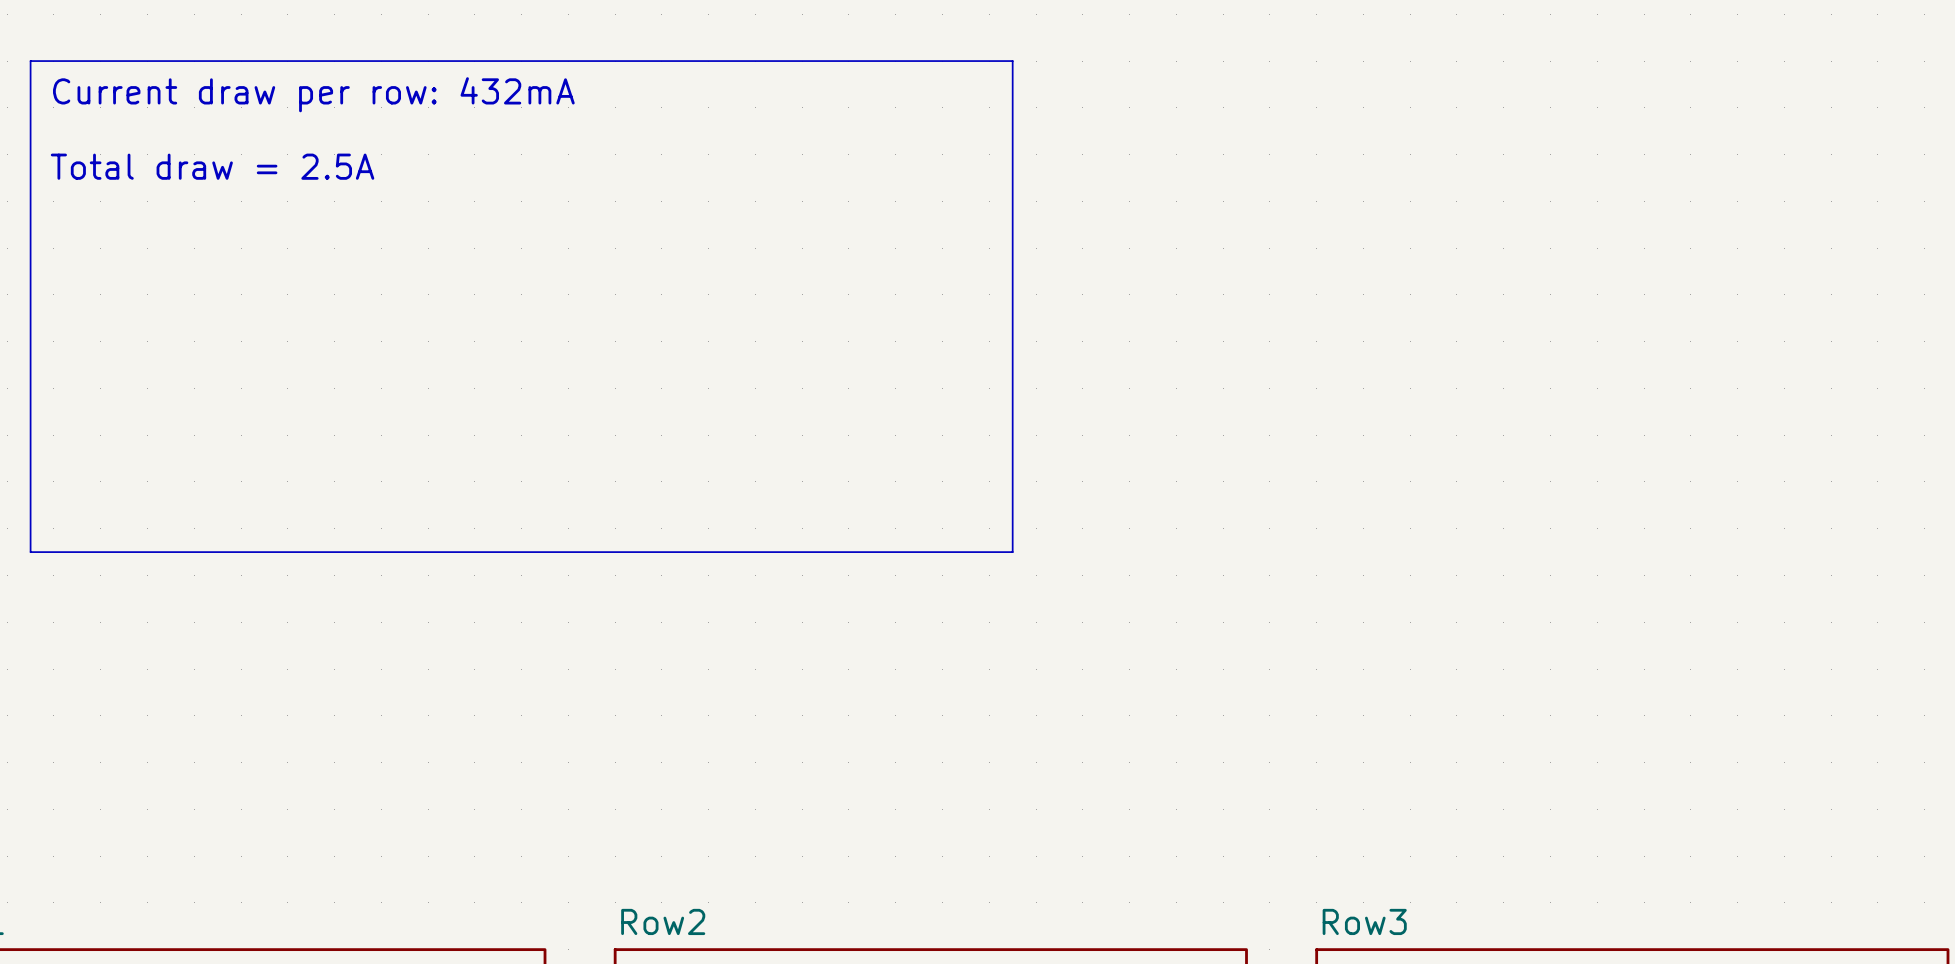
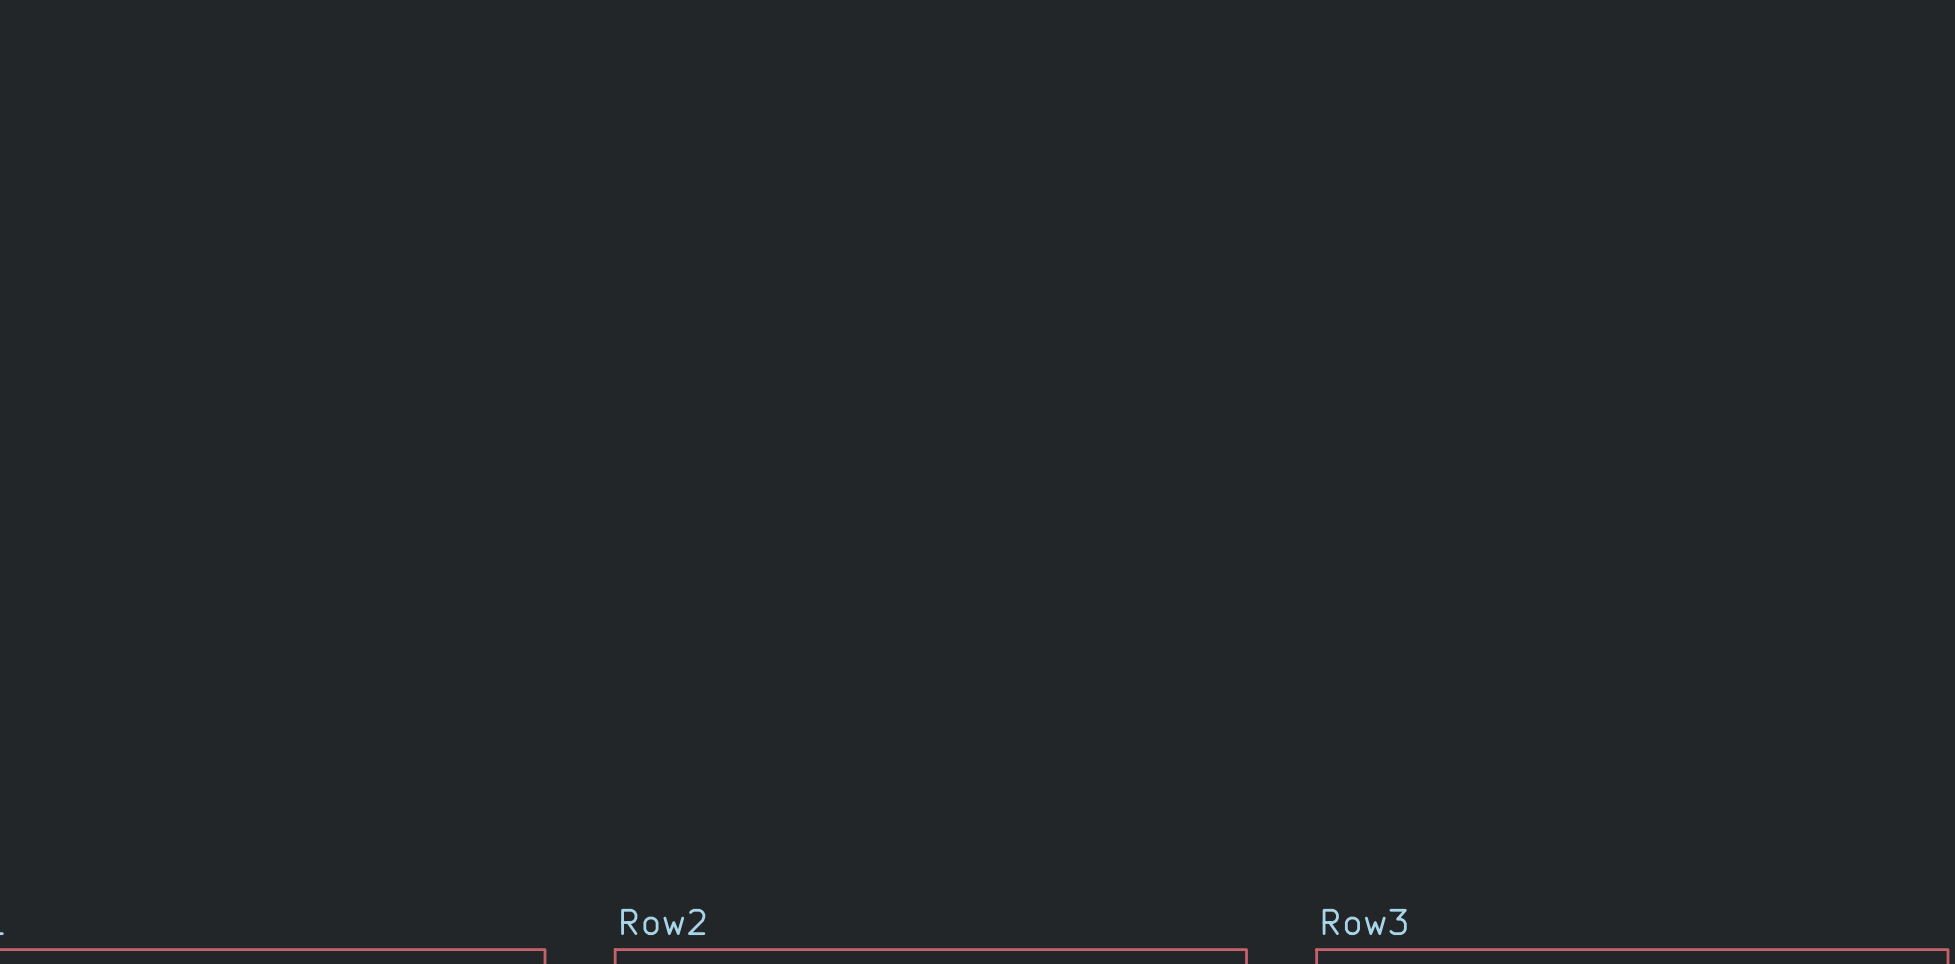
line: (30, 61) (1012, 61) (1012, 552) (30, 552) (30, 61) -> none
text: Current draw per row: 432mA (313, 94) -> none
text: Total draw = 2.5A (212, 166) -> none

